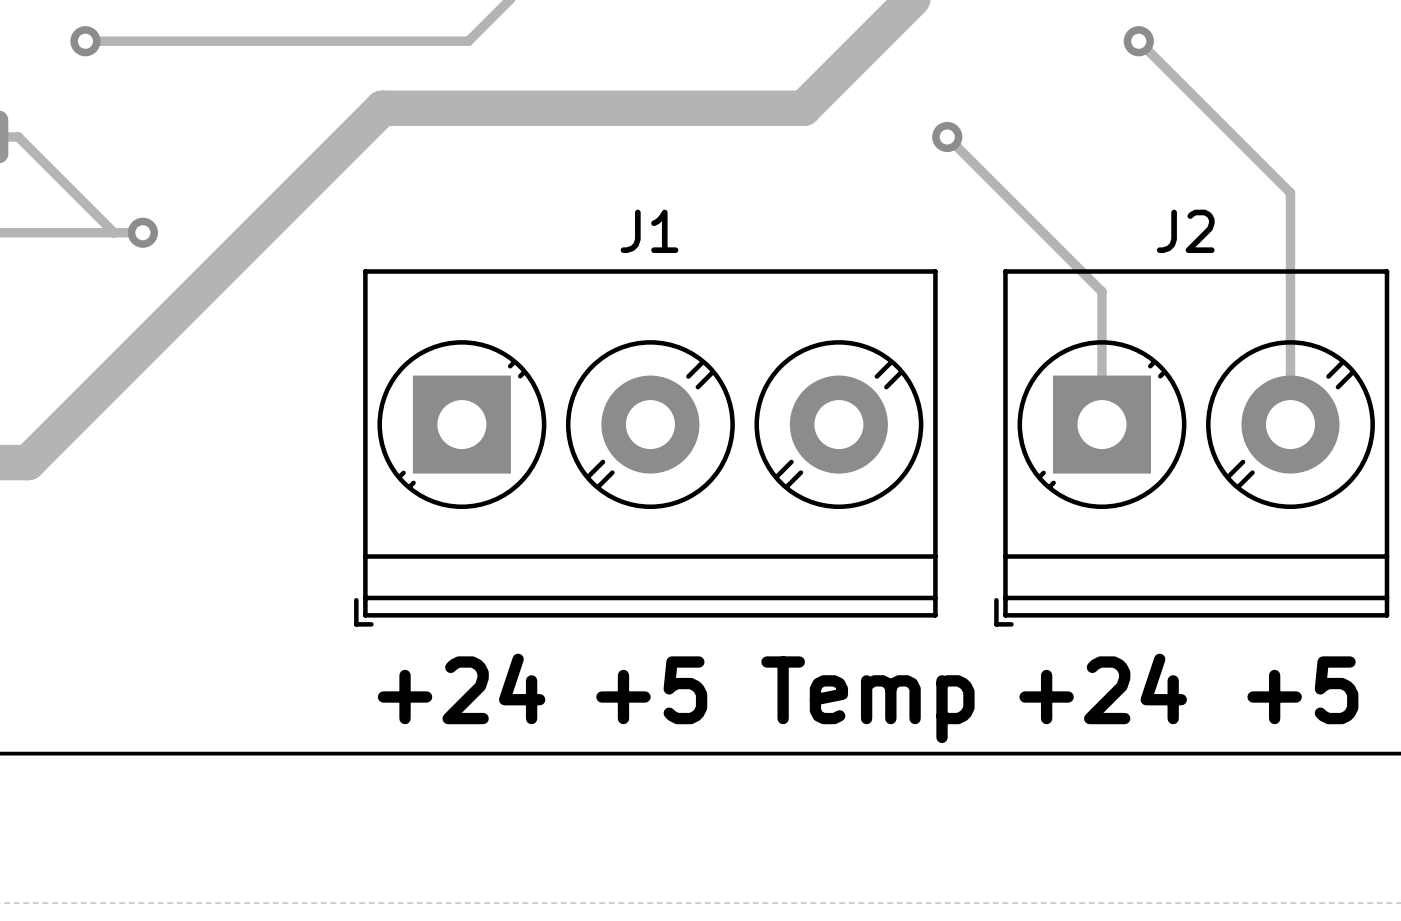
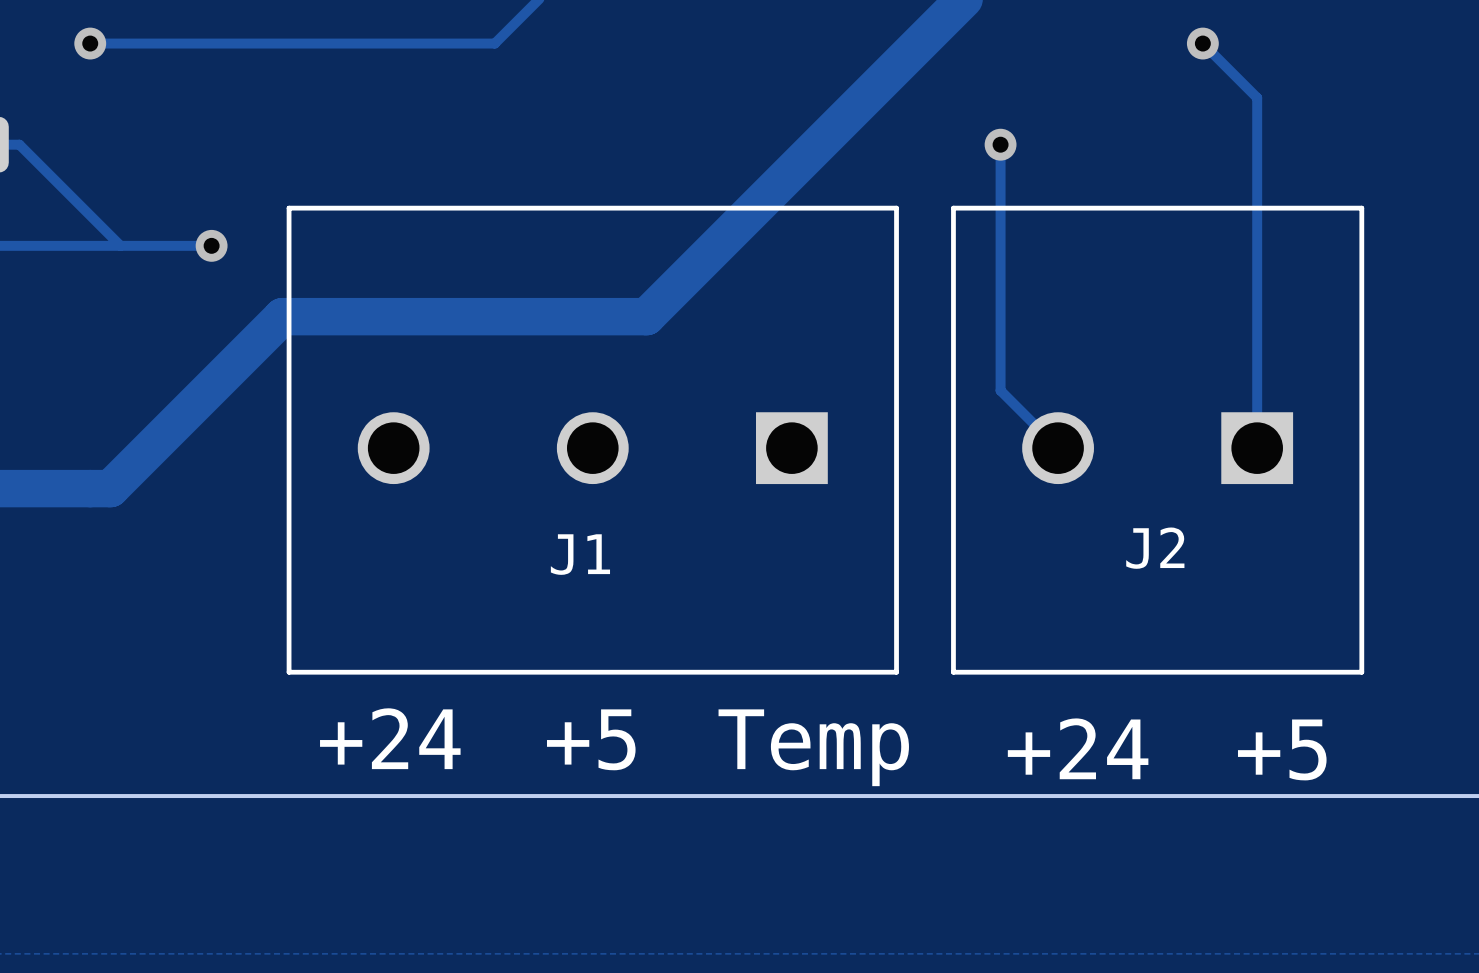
track: (1190, 92) (1290, 192) (1290, 424) -> (1257, 97) (1257, 448)
track: (803, 108) (382, 108) (27, 462) -> (848, 114) (646, 316) (282, 316) (110, 488) (29, 488)
track: (947, 136) (1101, 291) (1101, 424) -> (1000, 144) (1000, 390) (1058, 448)
J1 name position: J1 (649, 231) -> J1 (580, 554)
J2 name position: J2 (1185, 231) -> J2 (1155, 548)
track: none -> (150, 245) (211, 245)
via position: (142, 232) -> (211, 245)
J1 footprint: [354, 269, 938, 627] -> [286, 205, 899, 675]
J2 footprint: [994, 269, 1390, 627] -> [951, 205, 1365, 675]
text position: +24 (461, 688) -> +24 (390, 738)
text position: +24 (1103, 688) -> +24 (1078, 748)
text position: +5 (651, 690) -> +5 (591, 739)
text position: +5 (1302, 690) -> +5 (1282, 749)
text position: Temp (867, 699) -> Temp (813, 747)

